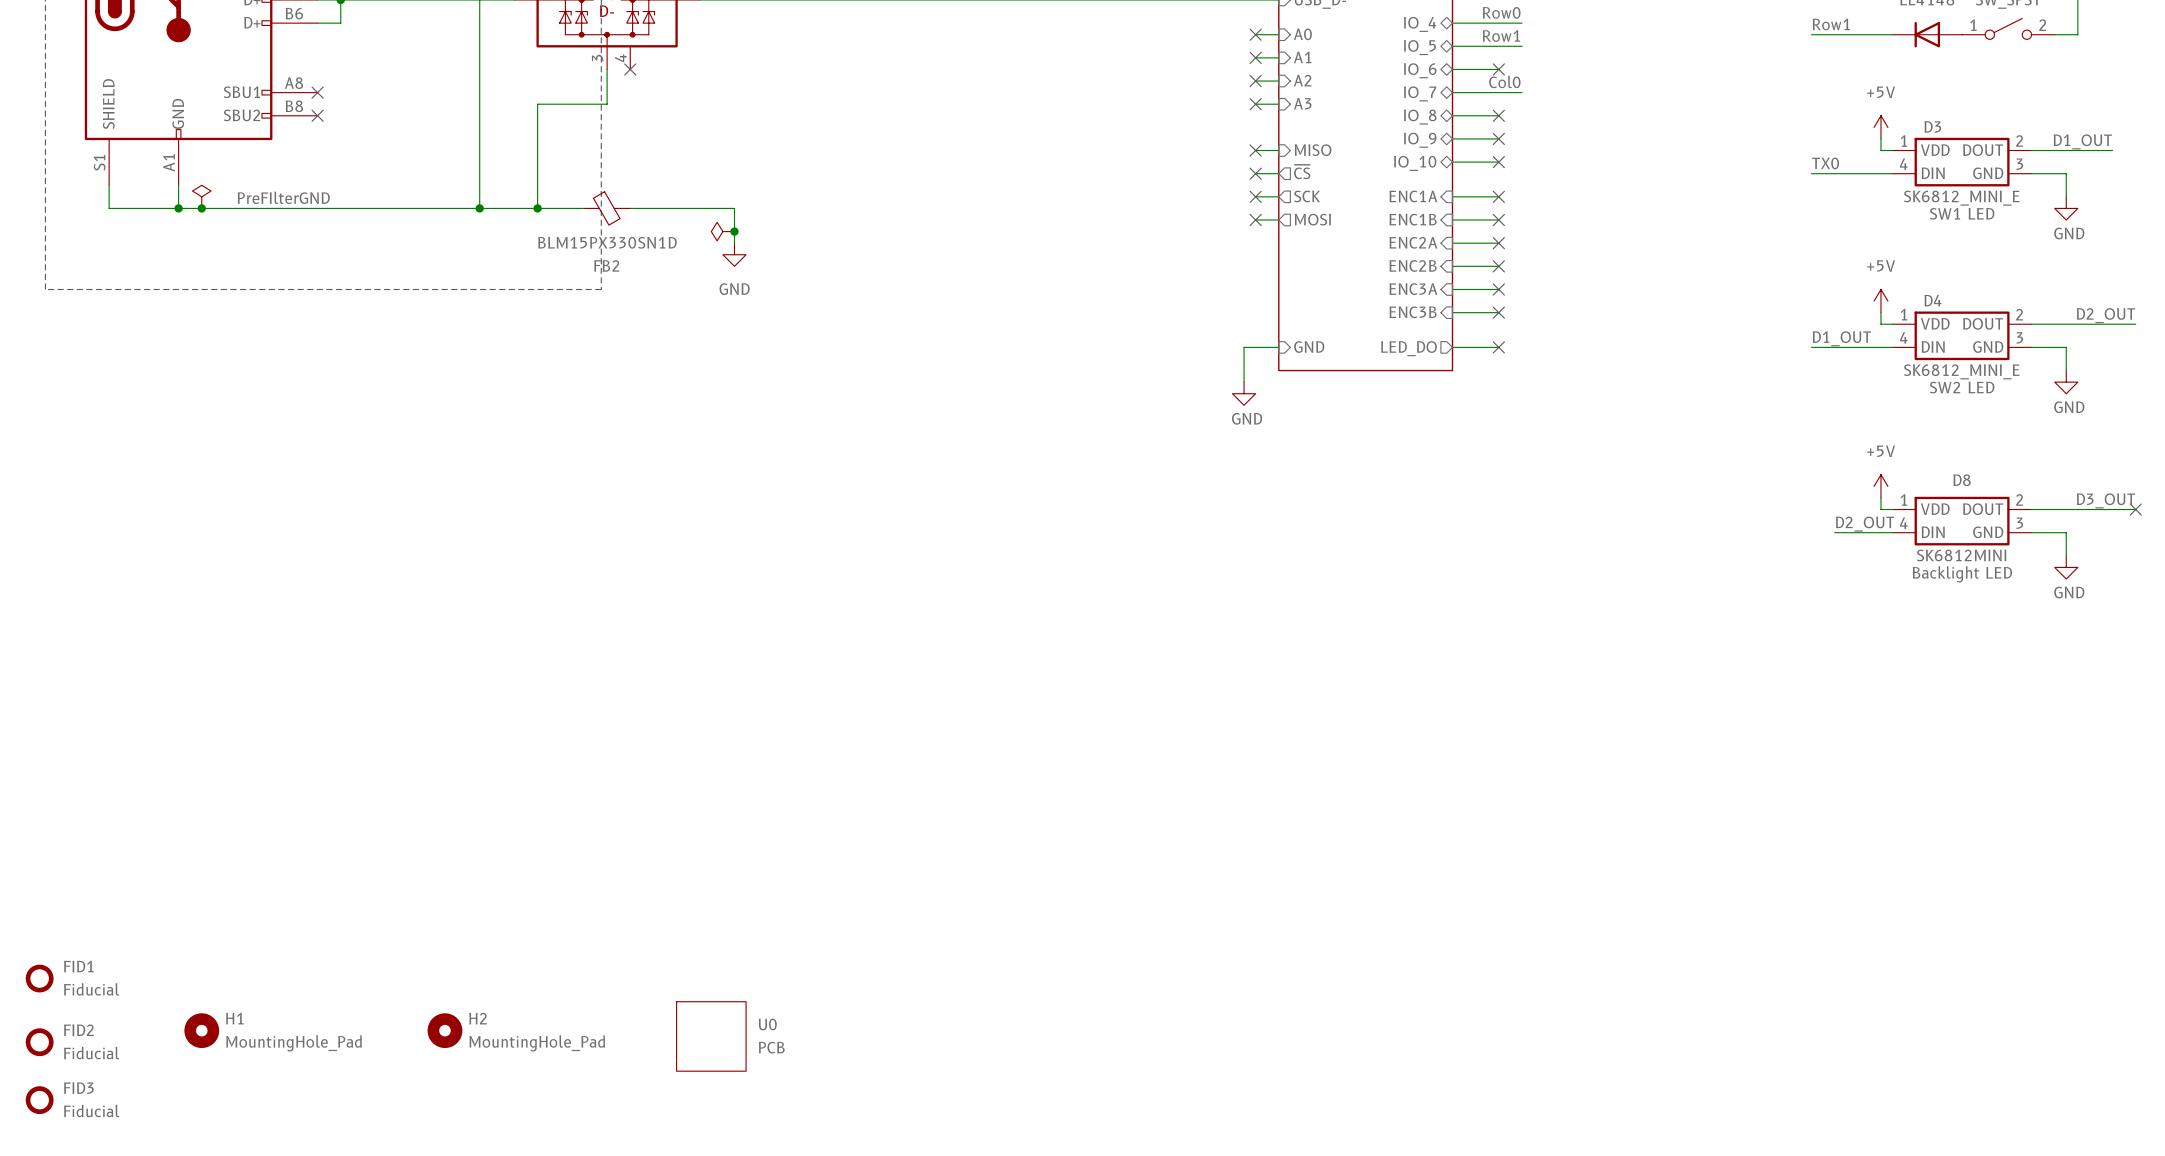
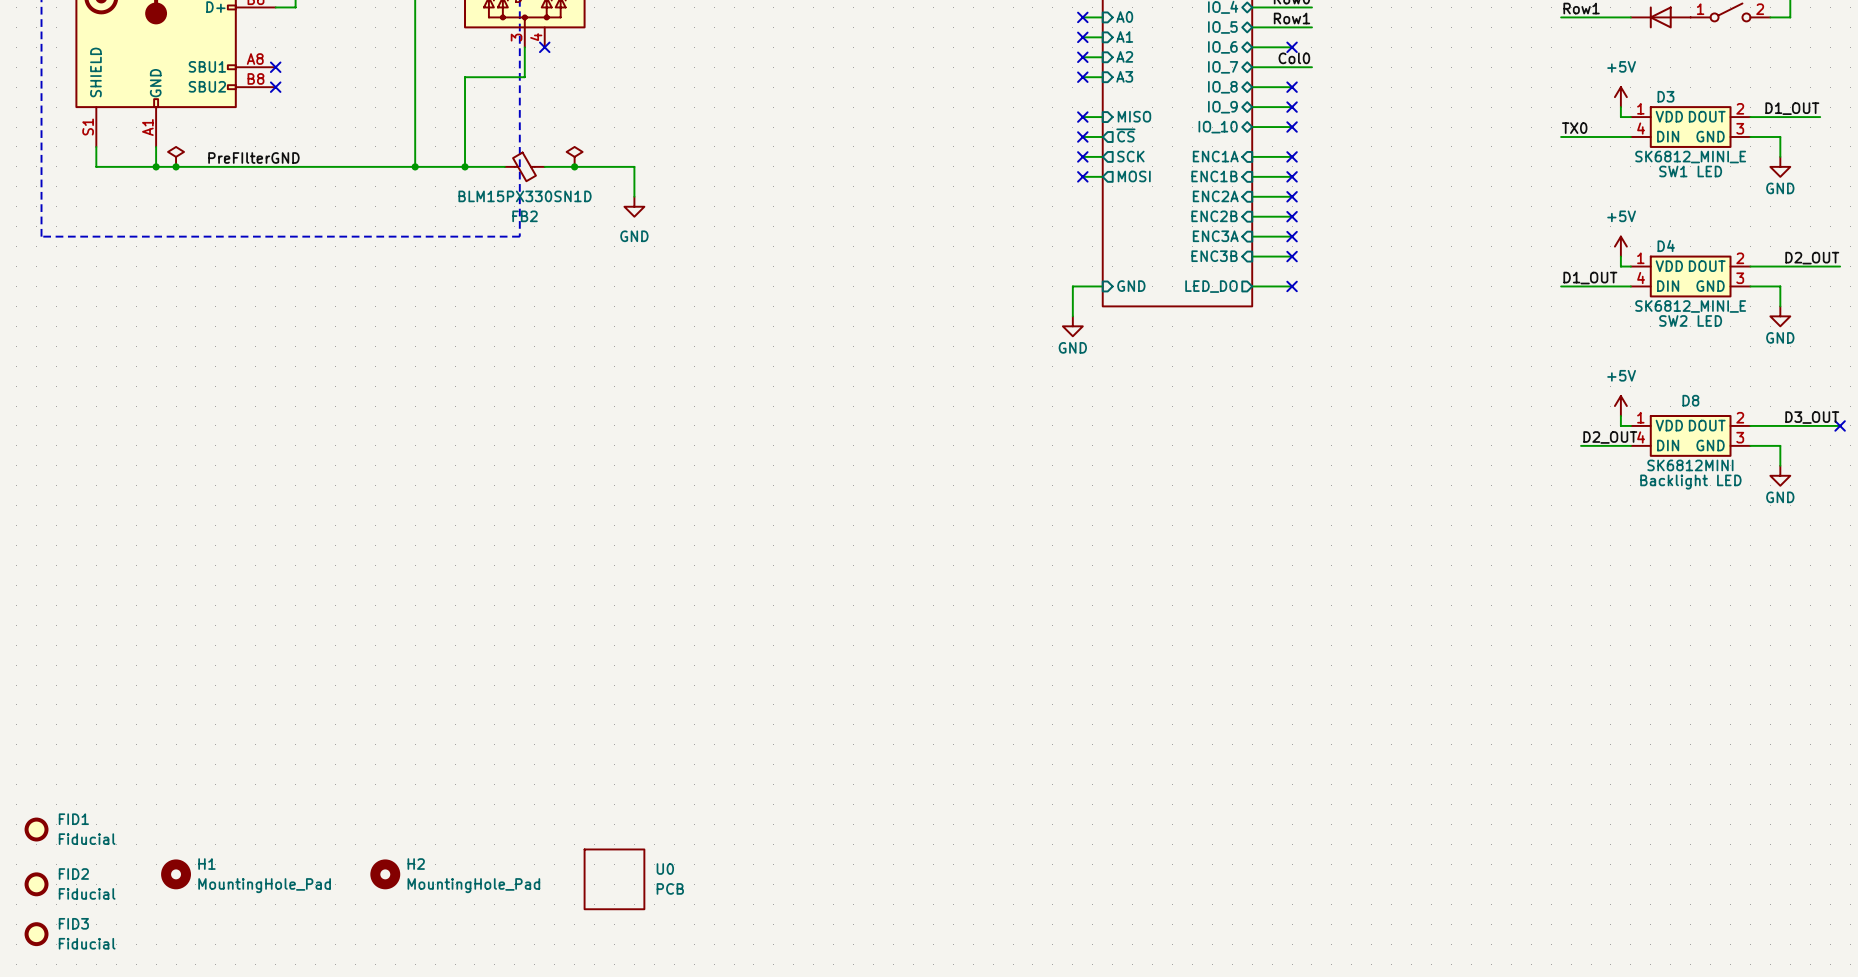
junction: none -> (574, 166)
power symbol rotation: 0° (722, 231) -> 90° clockwise (574, 156)
power symbol position: (722, 231) -> (574, 156)
junction: (734, 231) -> none

